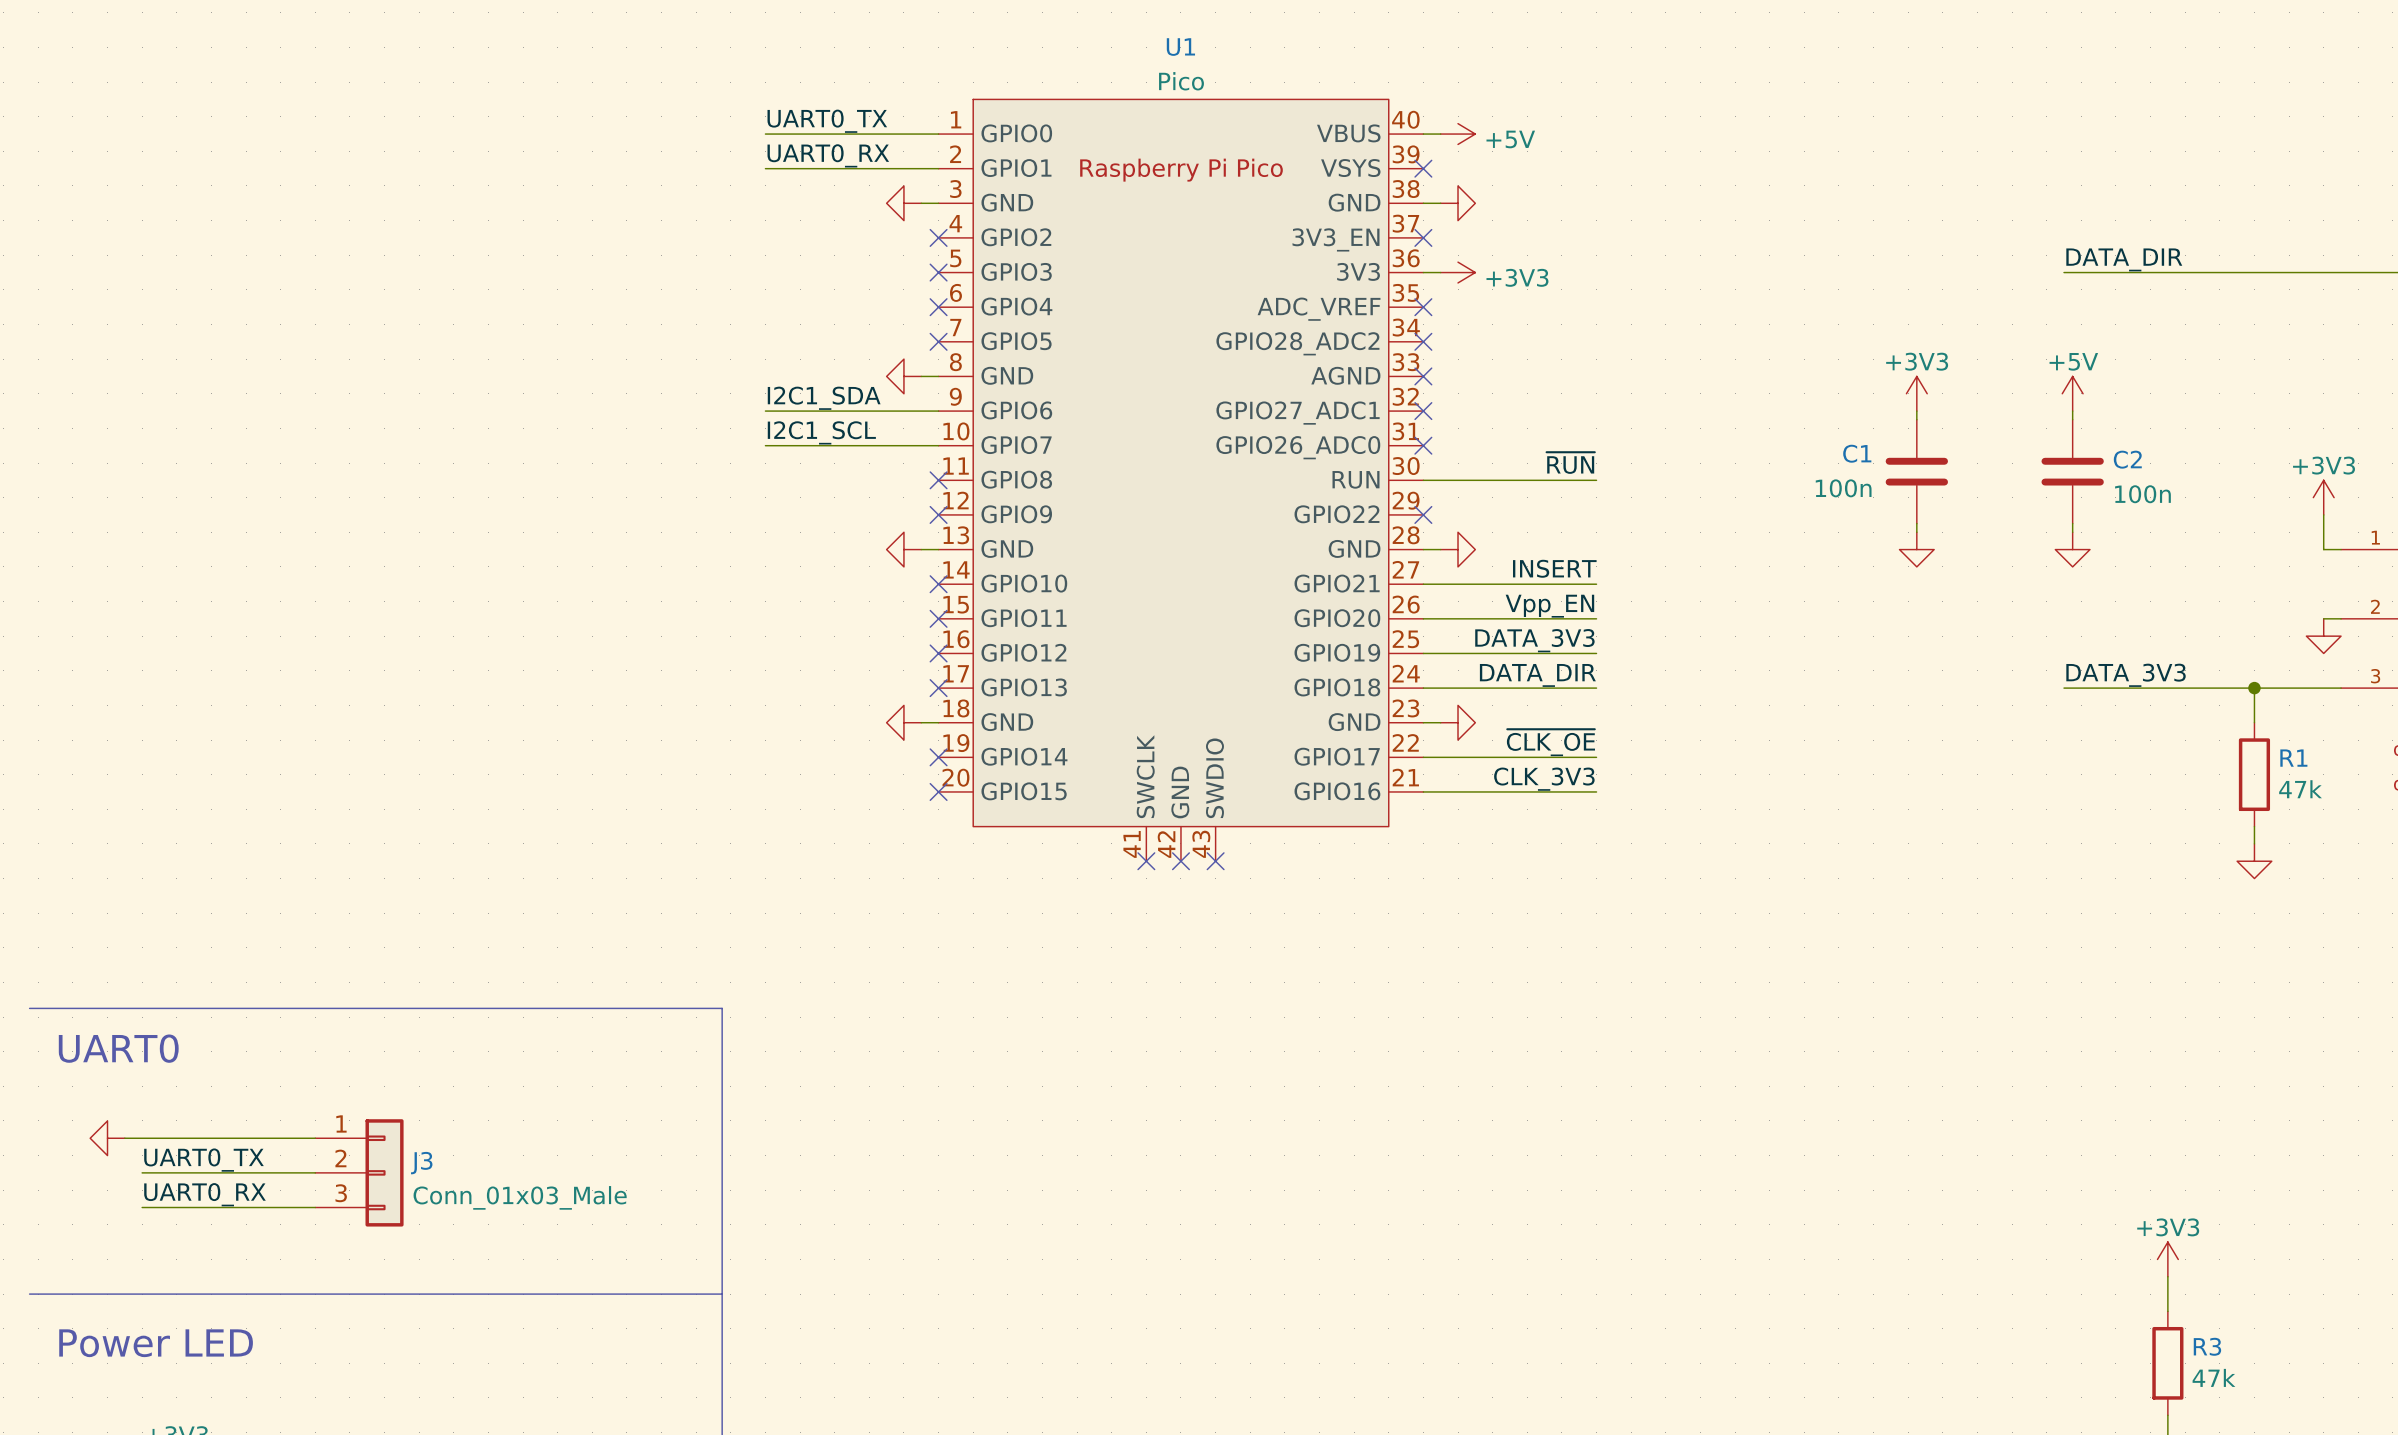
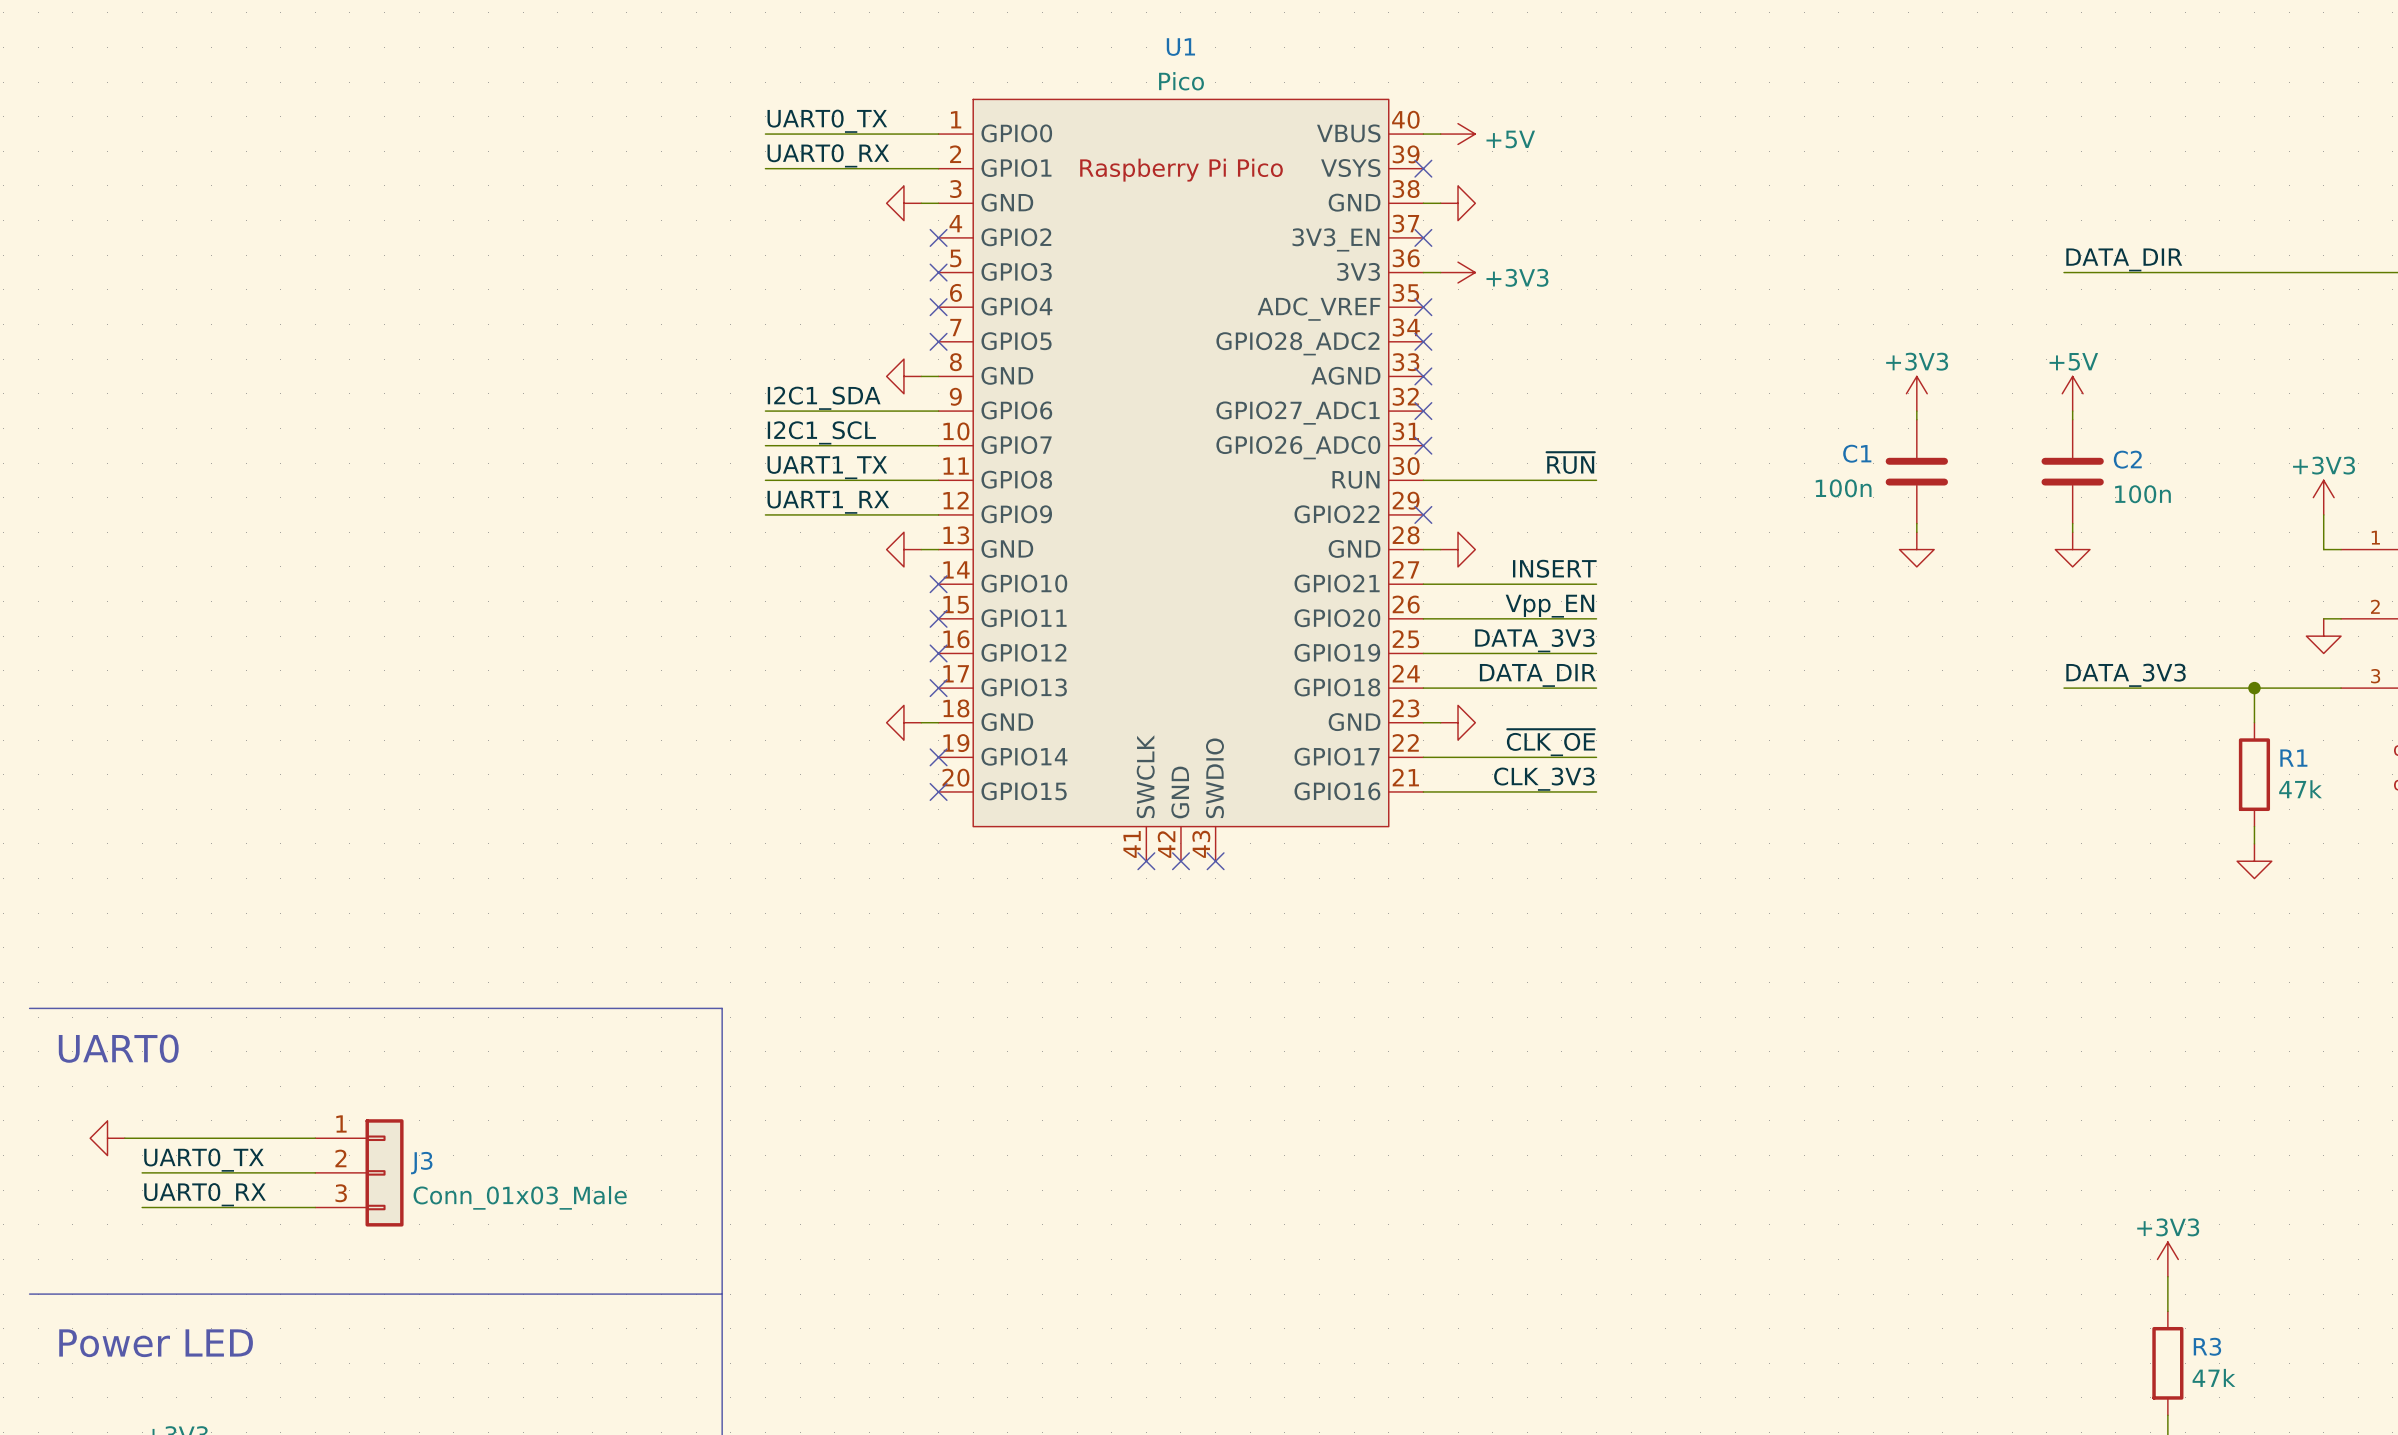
label: none -> UART1_TX (827, 467)
wire: none -> (765, 480) (938, 480)
no-connect mark: (938, 480) -> none
label: none -> UART1_RX (828, 502)
wire: none -> (765, 514) (938, 514)
no-connect mark: (938, 514) -> none

